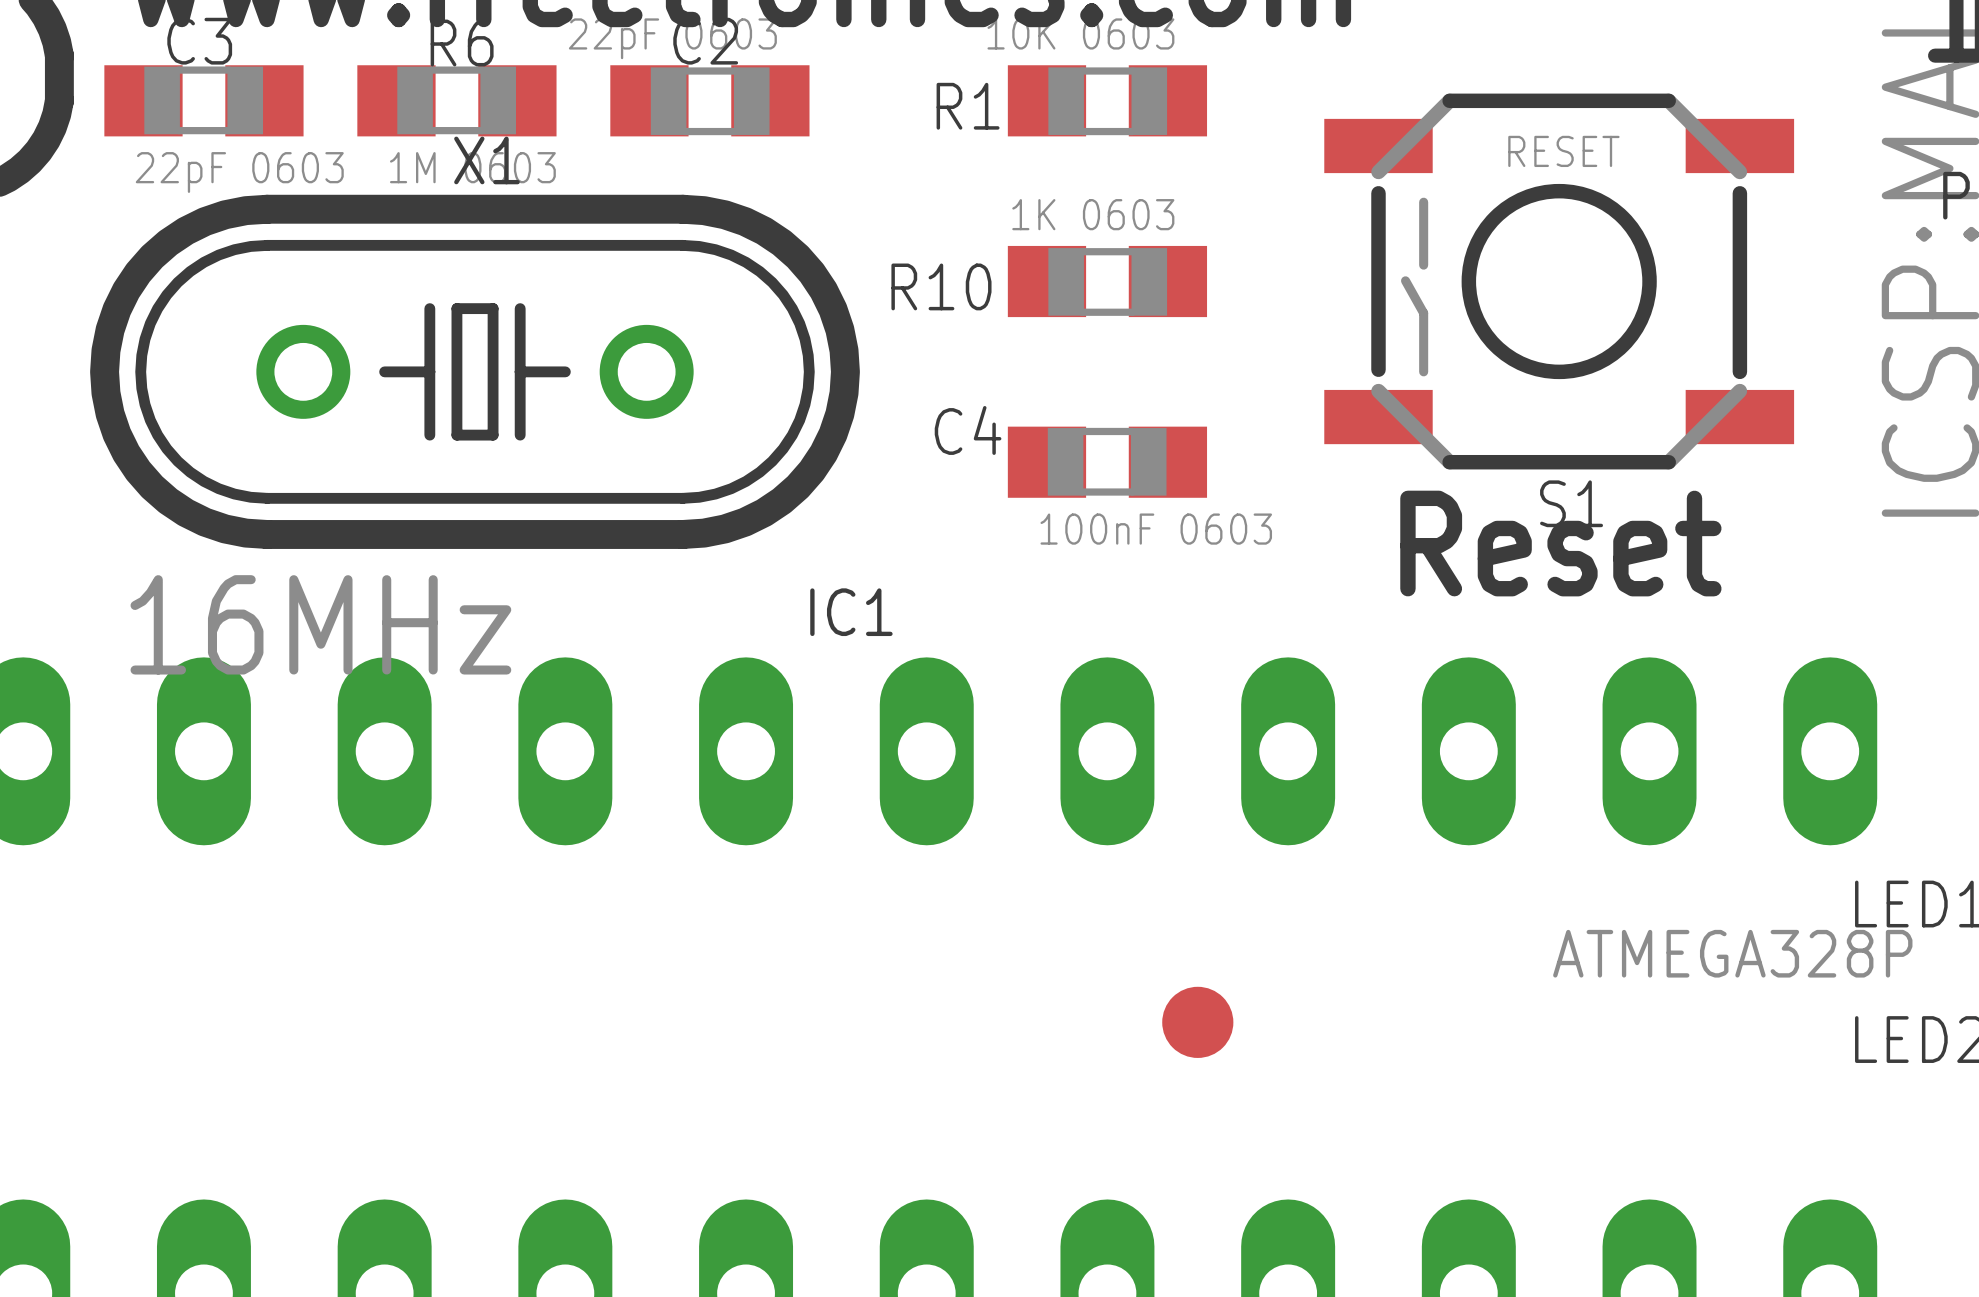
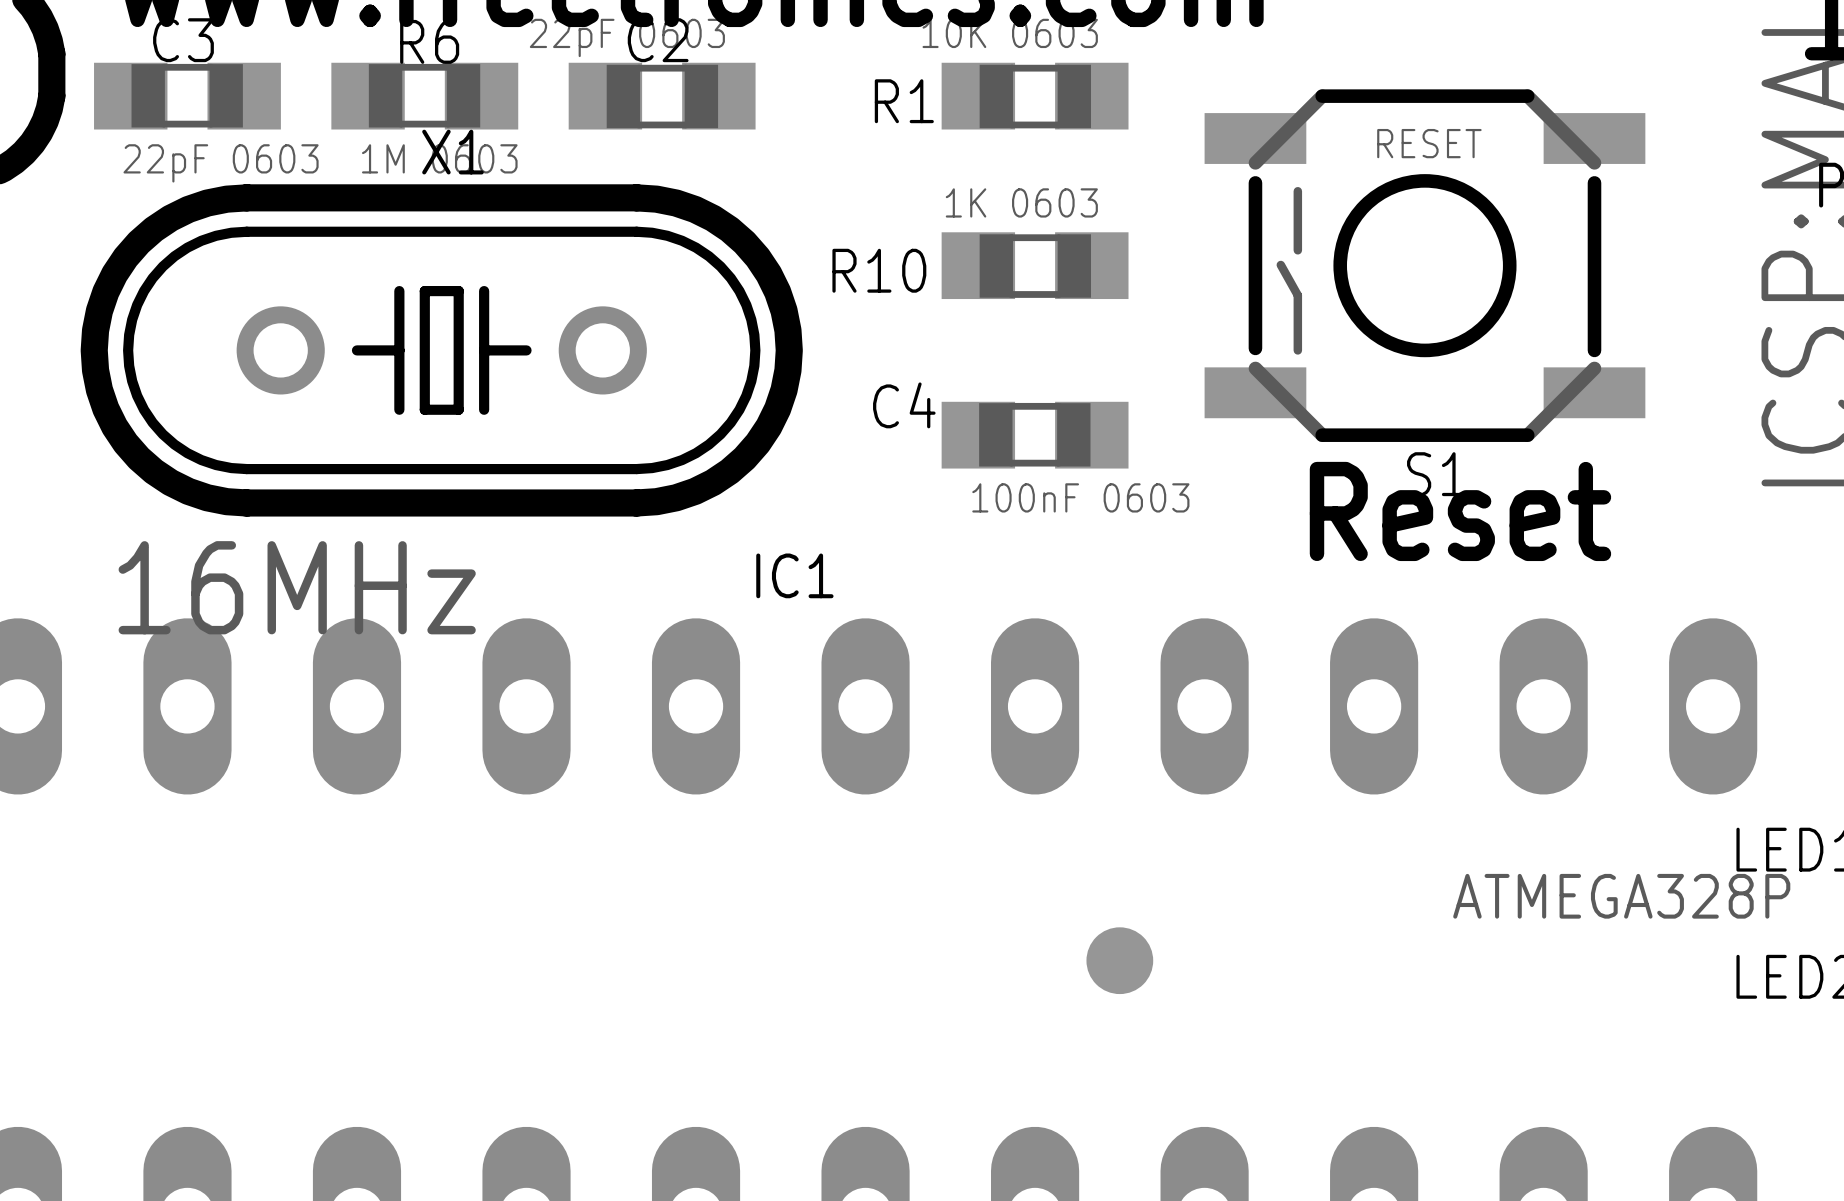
S1 position: (1559, 281) -> (1424, 265)

